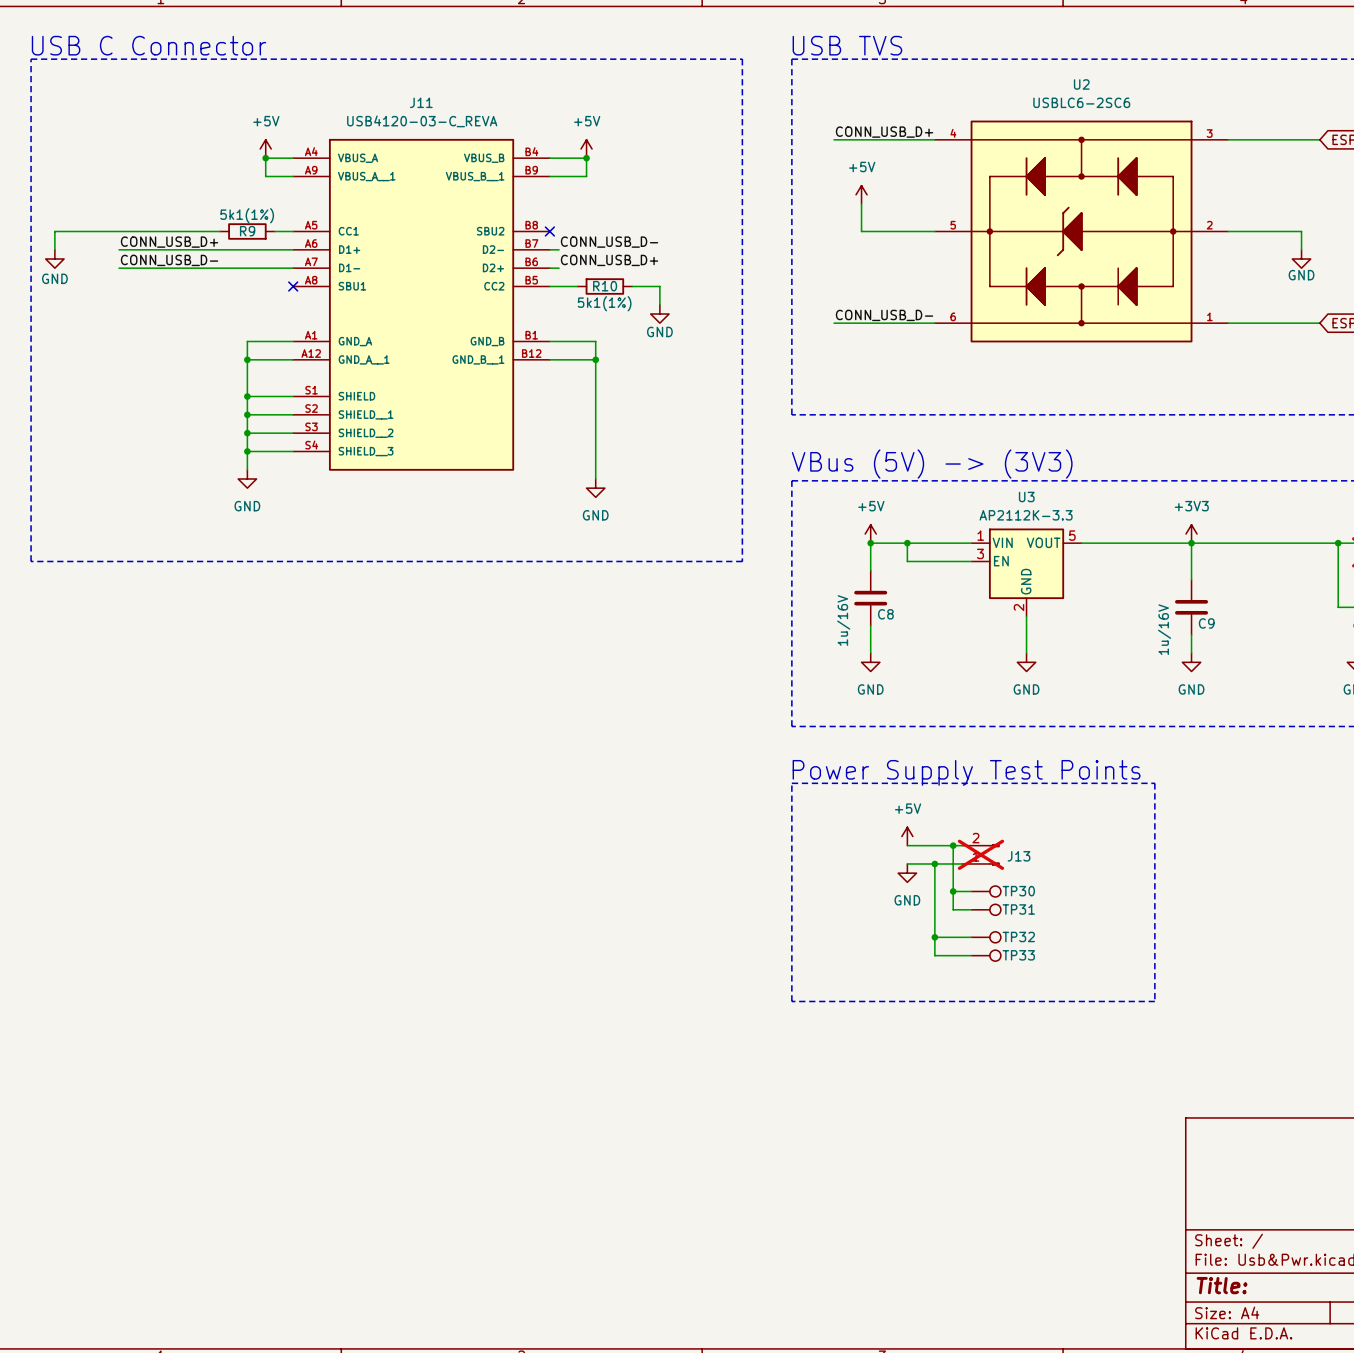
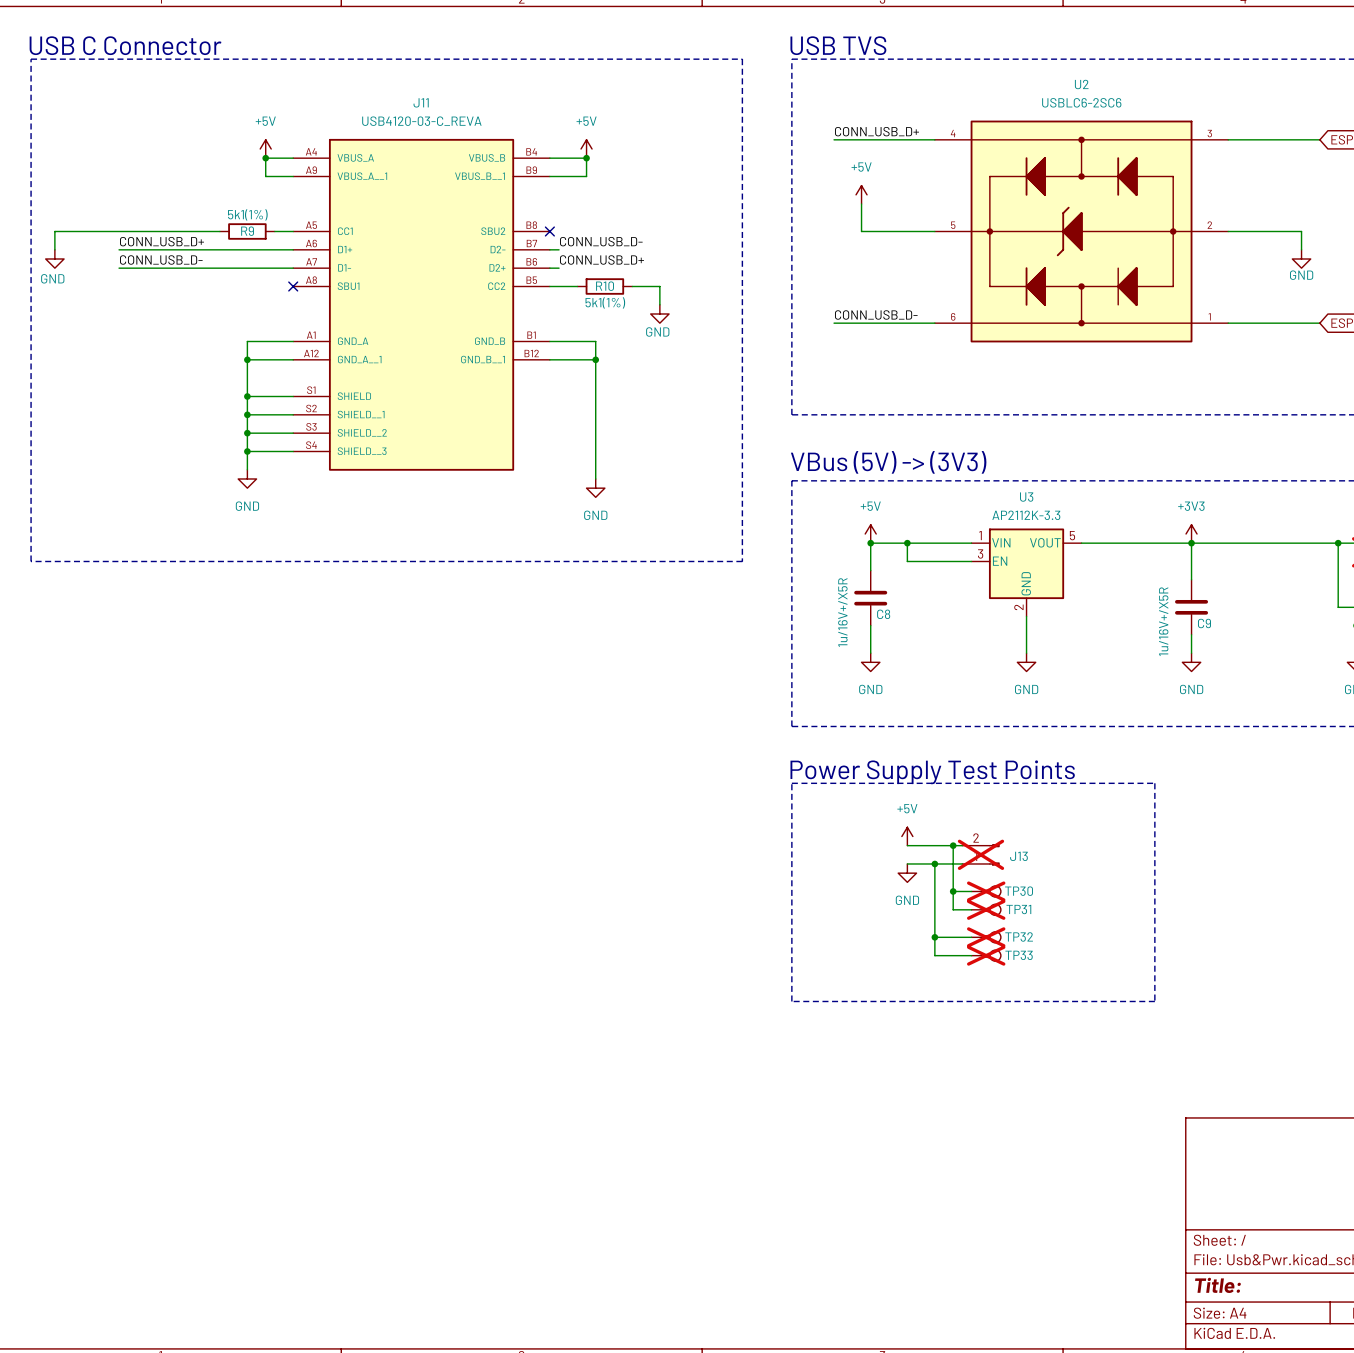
C8 value: 1u/16V (843, 620) -> 1u/16V+/X5R (842, 612)
C9 value: 1u/16V (1164, 629) -> 1u/16V+/X5R (1163, 621)
TP30 do-not-place cross: none -> (986, 891)
TP31 do-not-place cross: none -> (986, 909)
TP32 do-not-place cross: none -> (986, 937)
TP33 do-not-place cross: none -> (986, 955)

